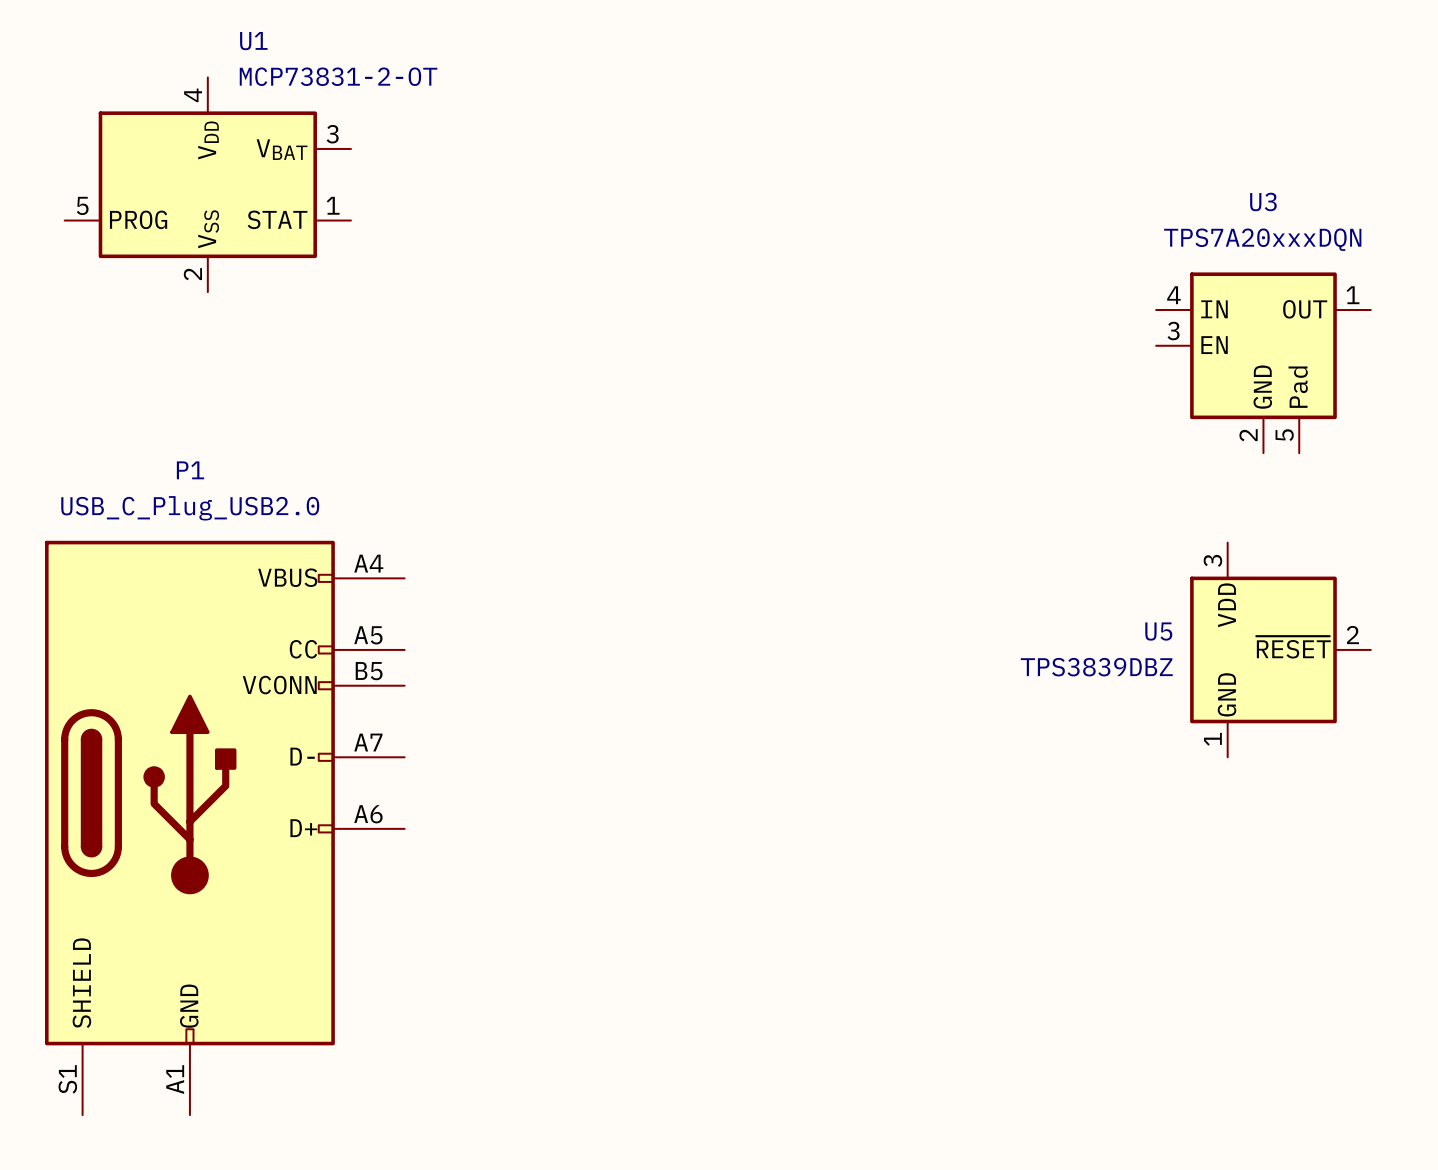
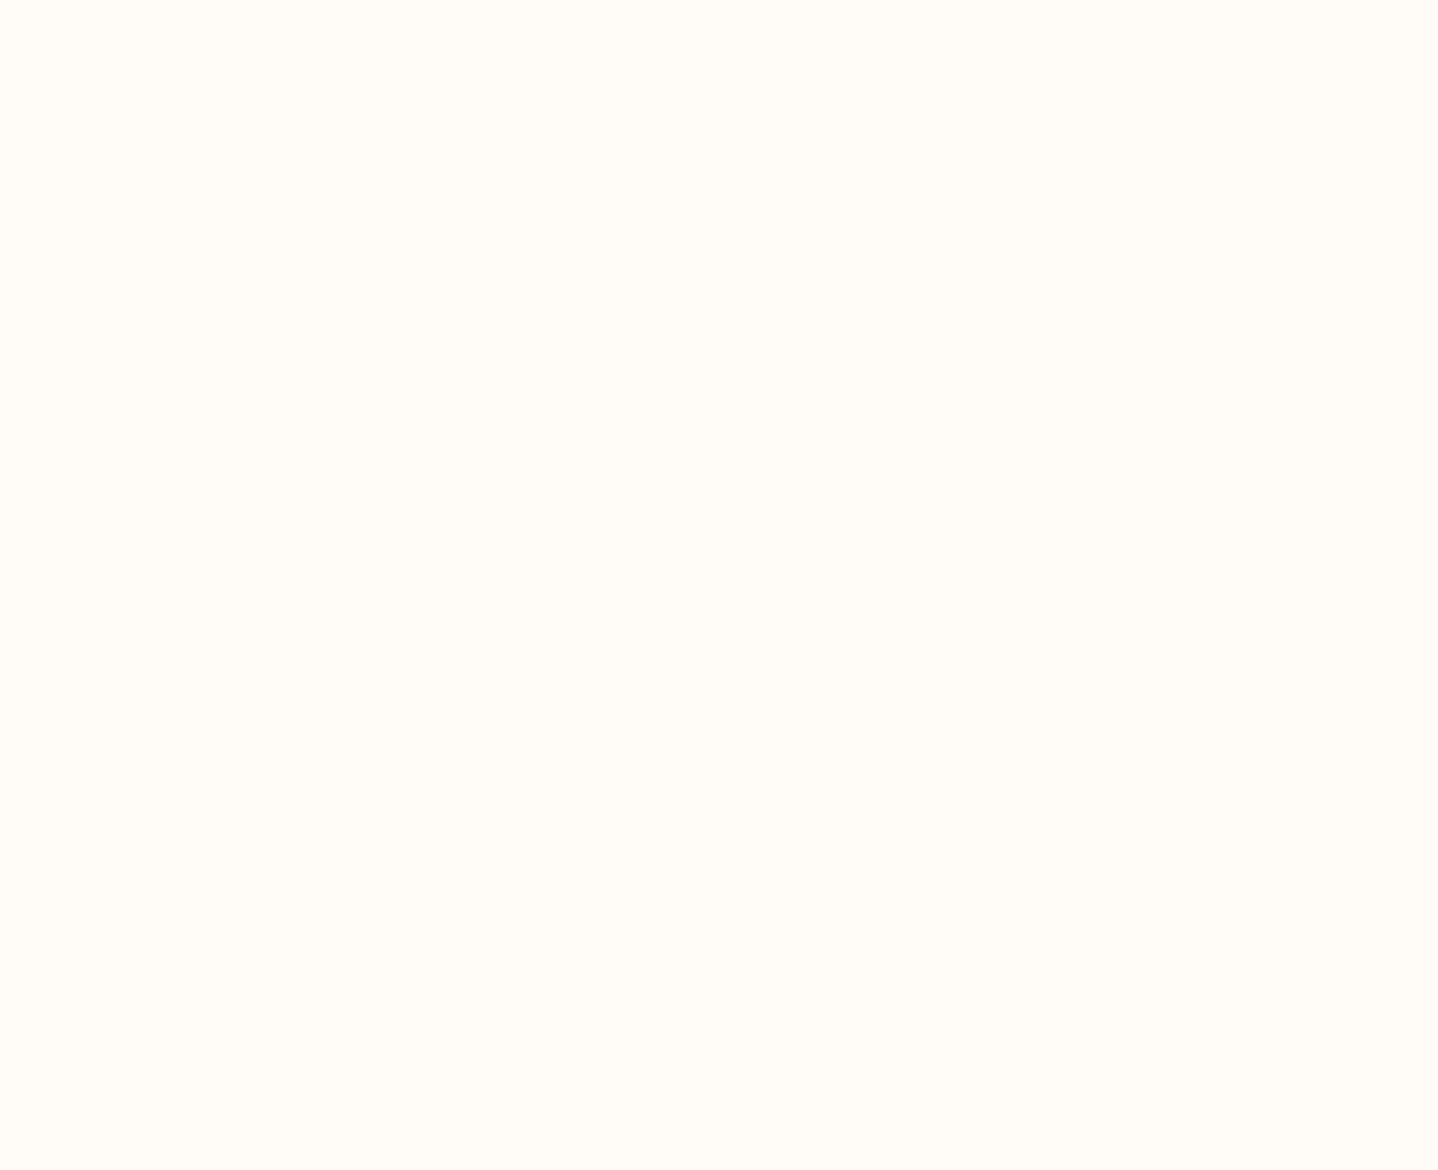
U1: MCP73831-2-OT (207, 184) -> none
U3: TPS7A20xxxDQN (1263, 362) -> none
U5: TPS3839DBZ (1280, 649) -> none
P1: USB_C_Plug_USB2.0 (224, 827) -> none

